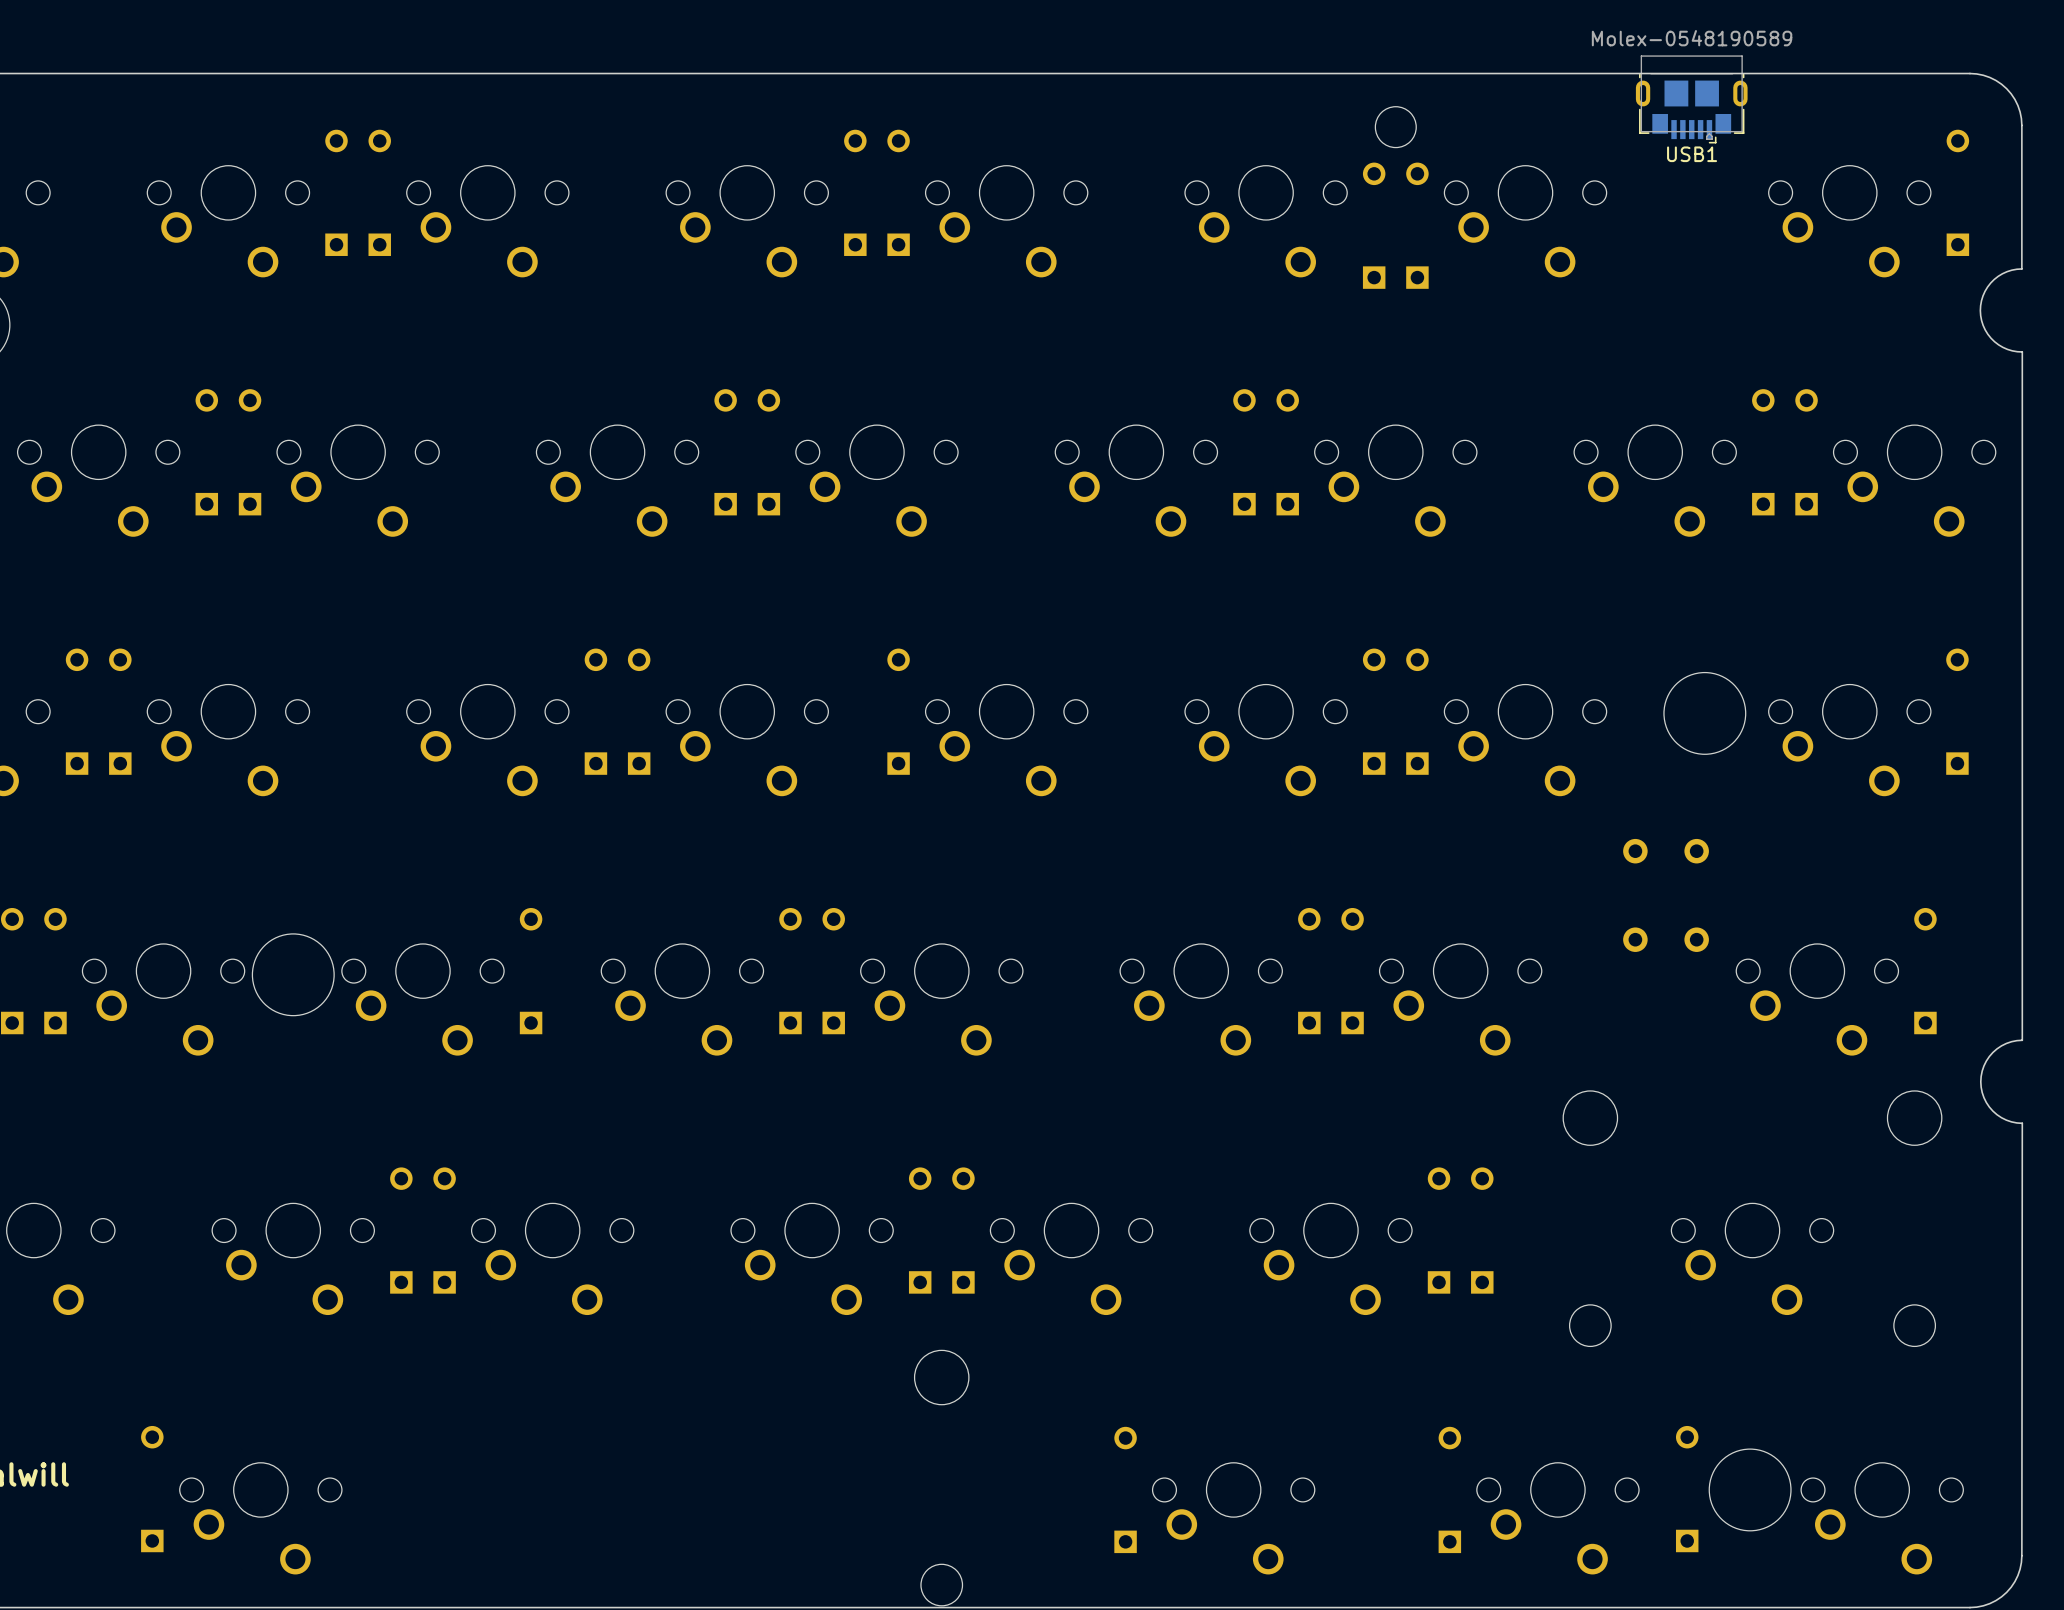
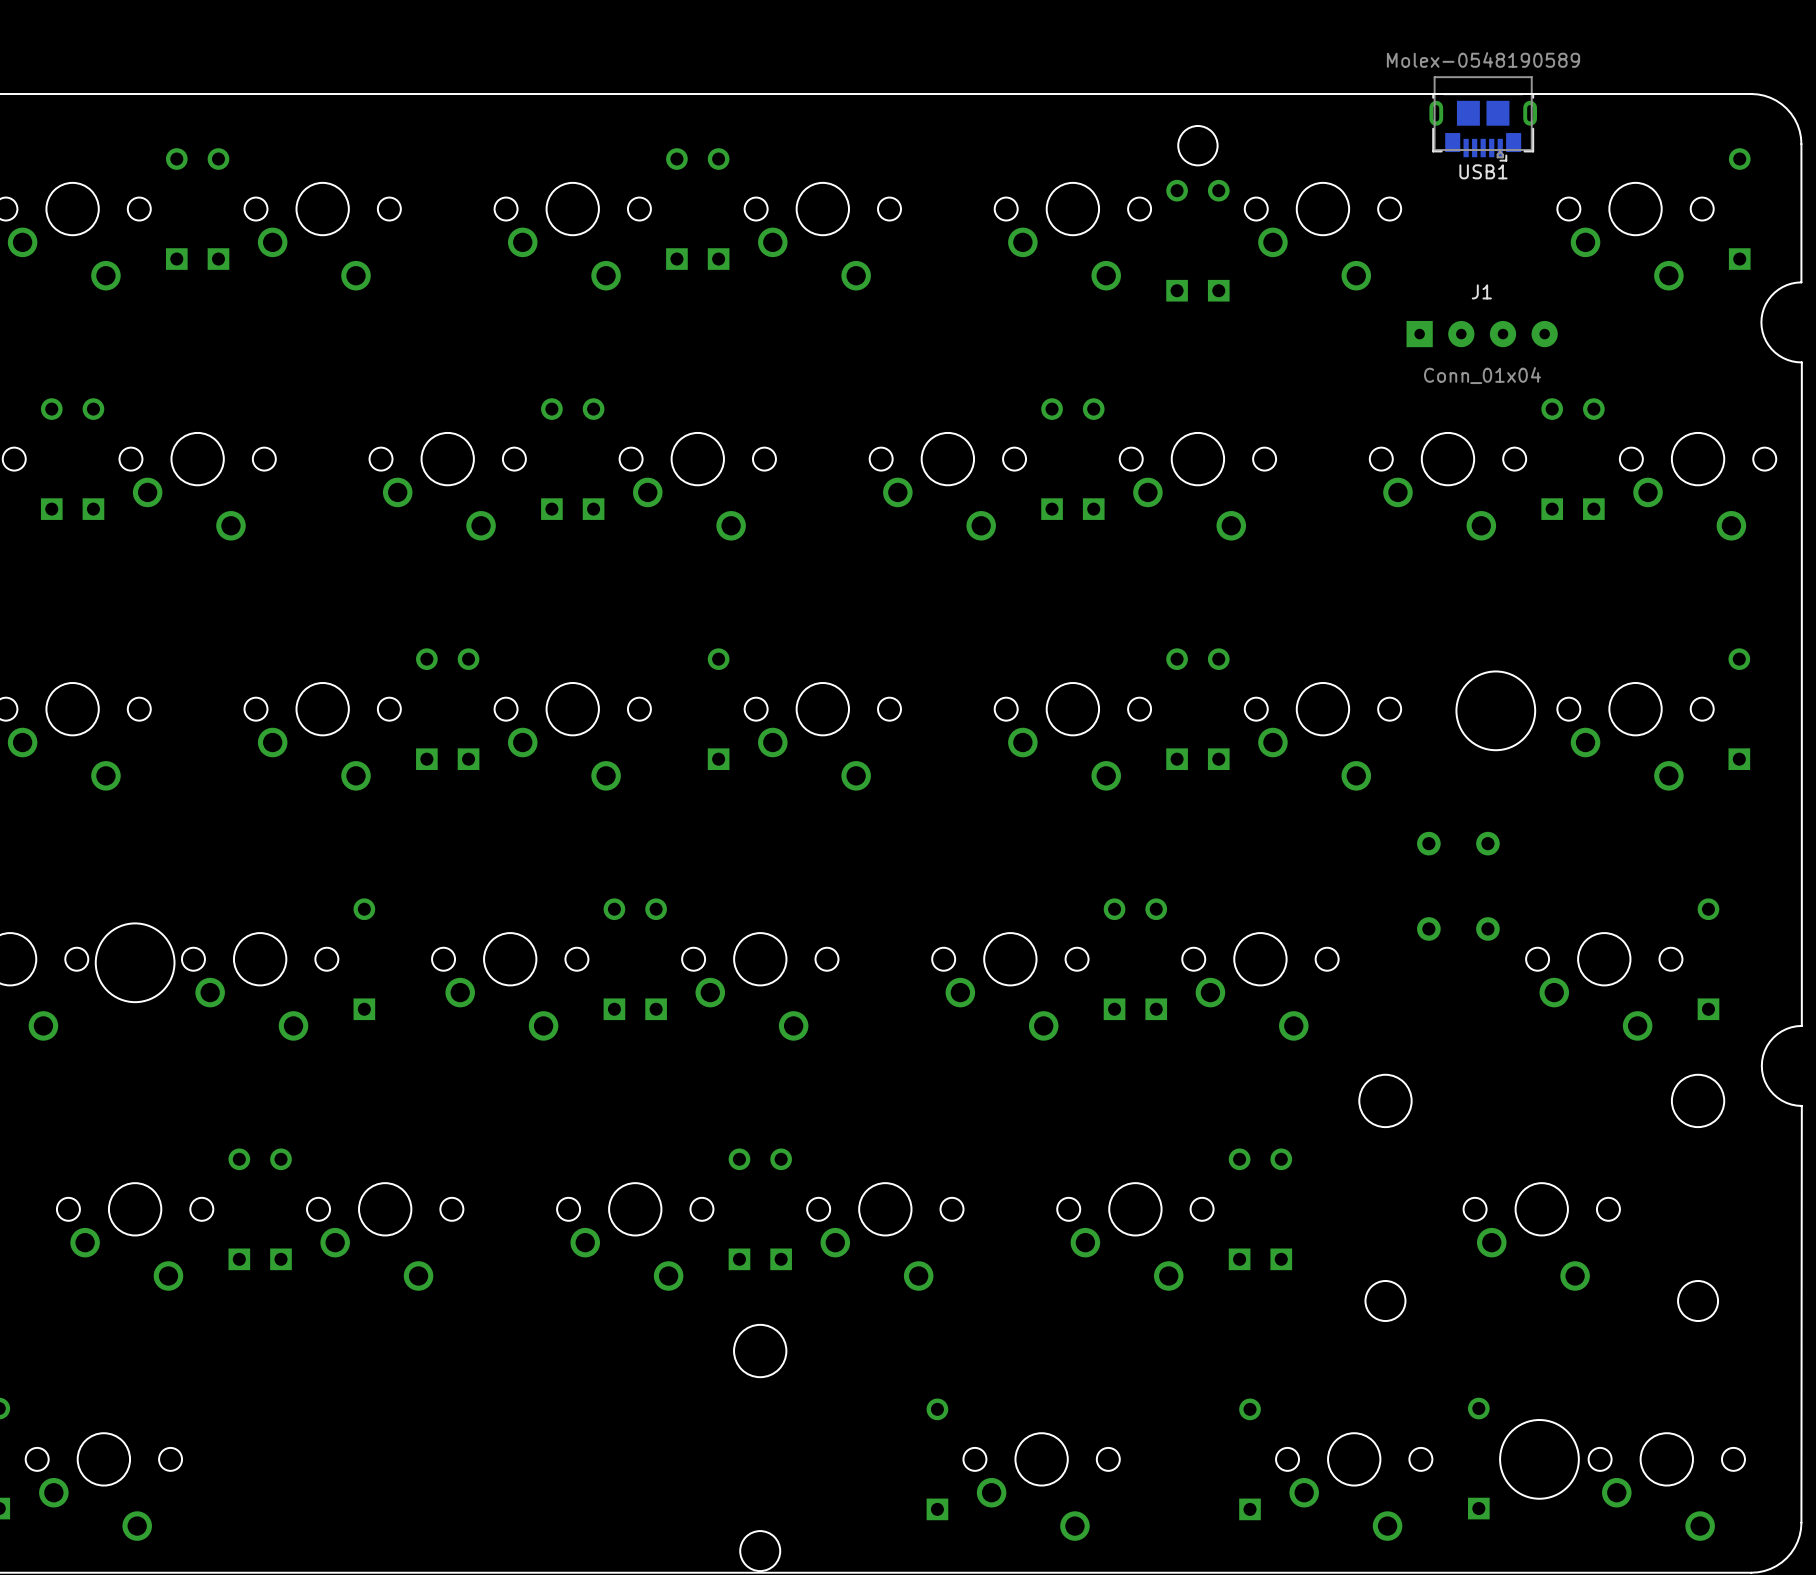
J1: none -> Conn_01x04 (1482, 334)

